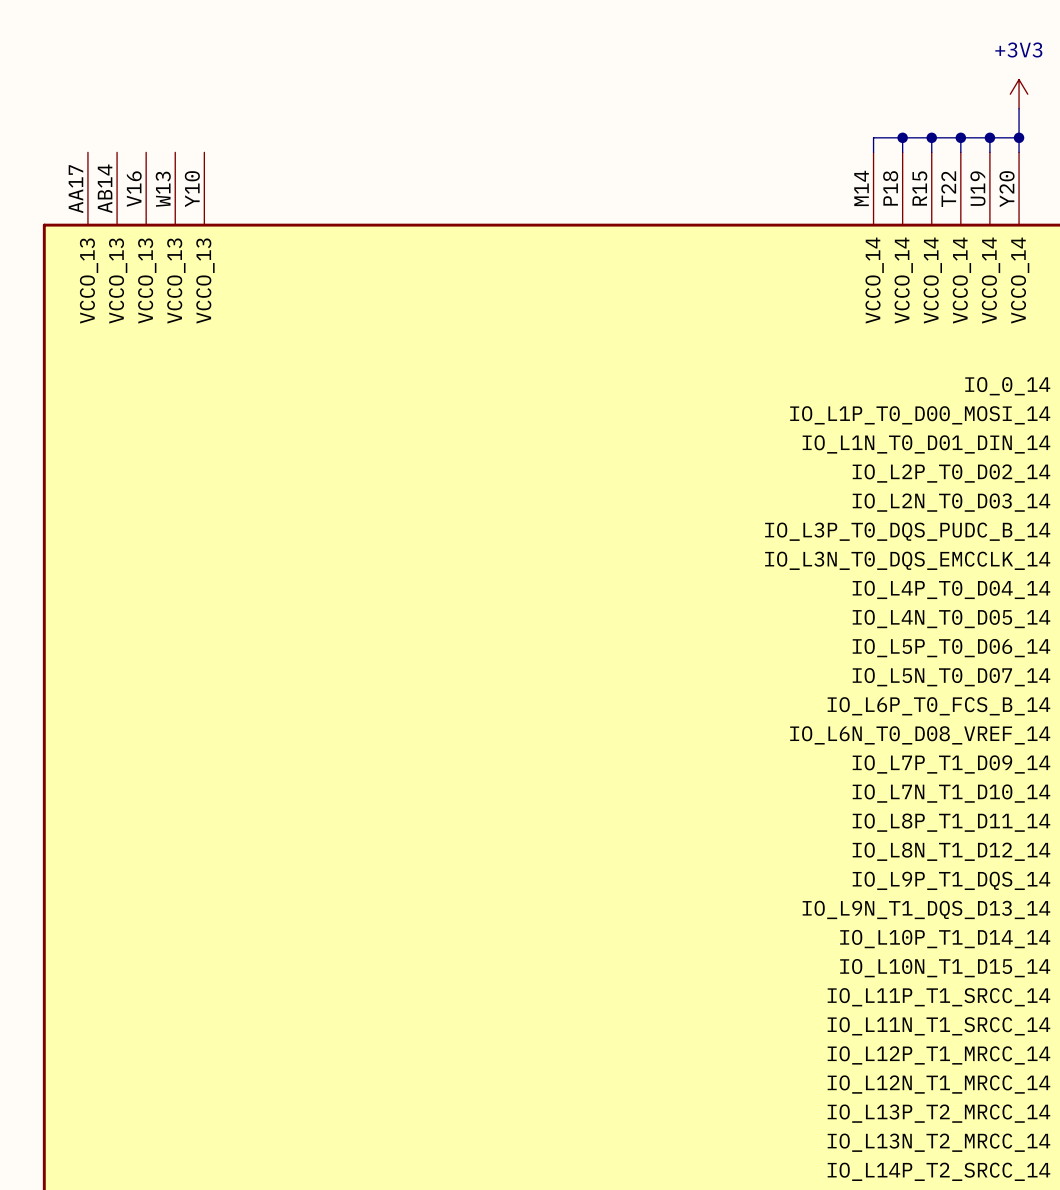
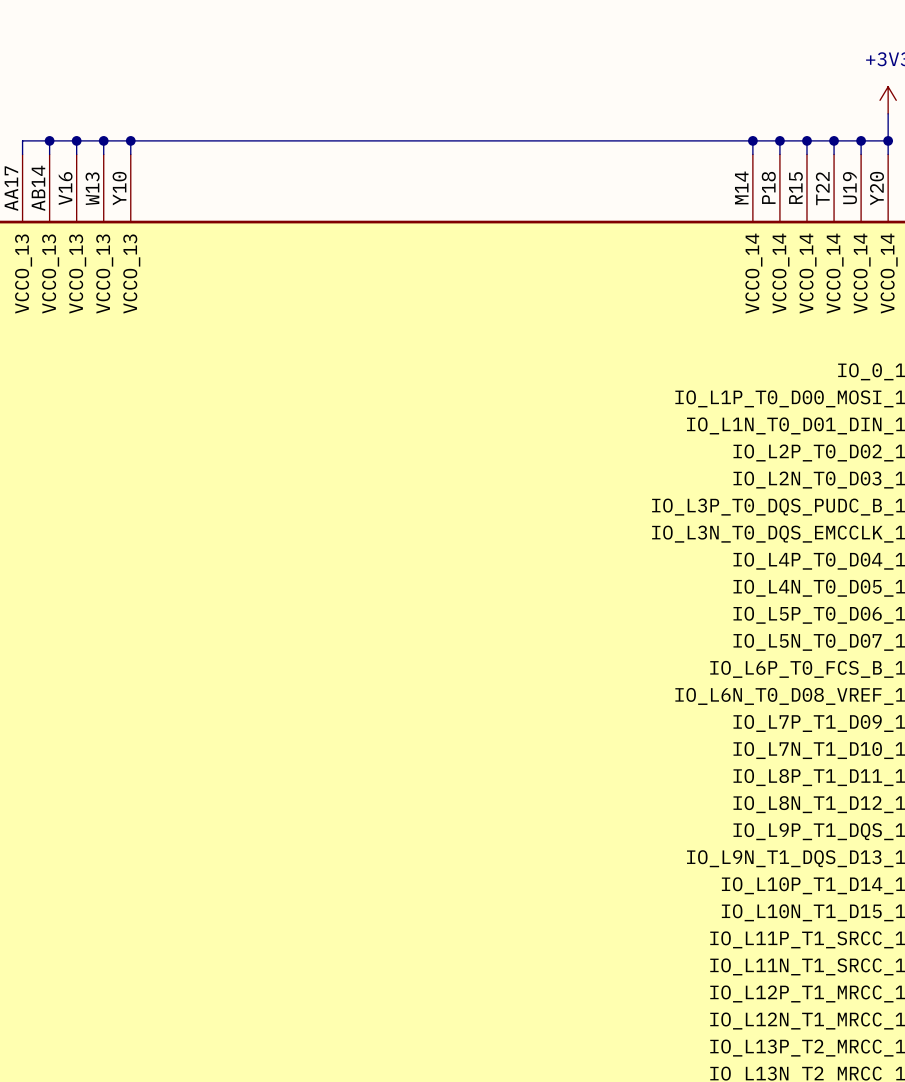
wire: none -> (49, 140) (49, 154)
junction: none -> (49, 140)
wire: none -> (76, 140) (76, 154)
junction: none -> (76, 140)
wire: none -> (103, 140) (103, 154)
junction: none -> (103, 140)
wire: none -> (130, 140) (130, 154)
junction: none -> (130, 140)
wire: none -> (752, 140) (22, 140) (22, 154)
junction: none -> (752, 140)

